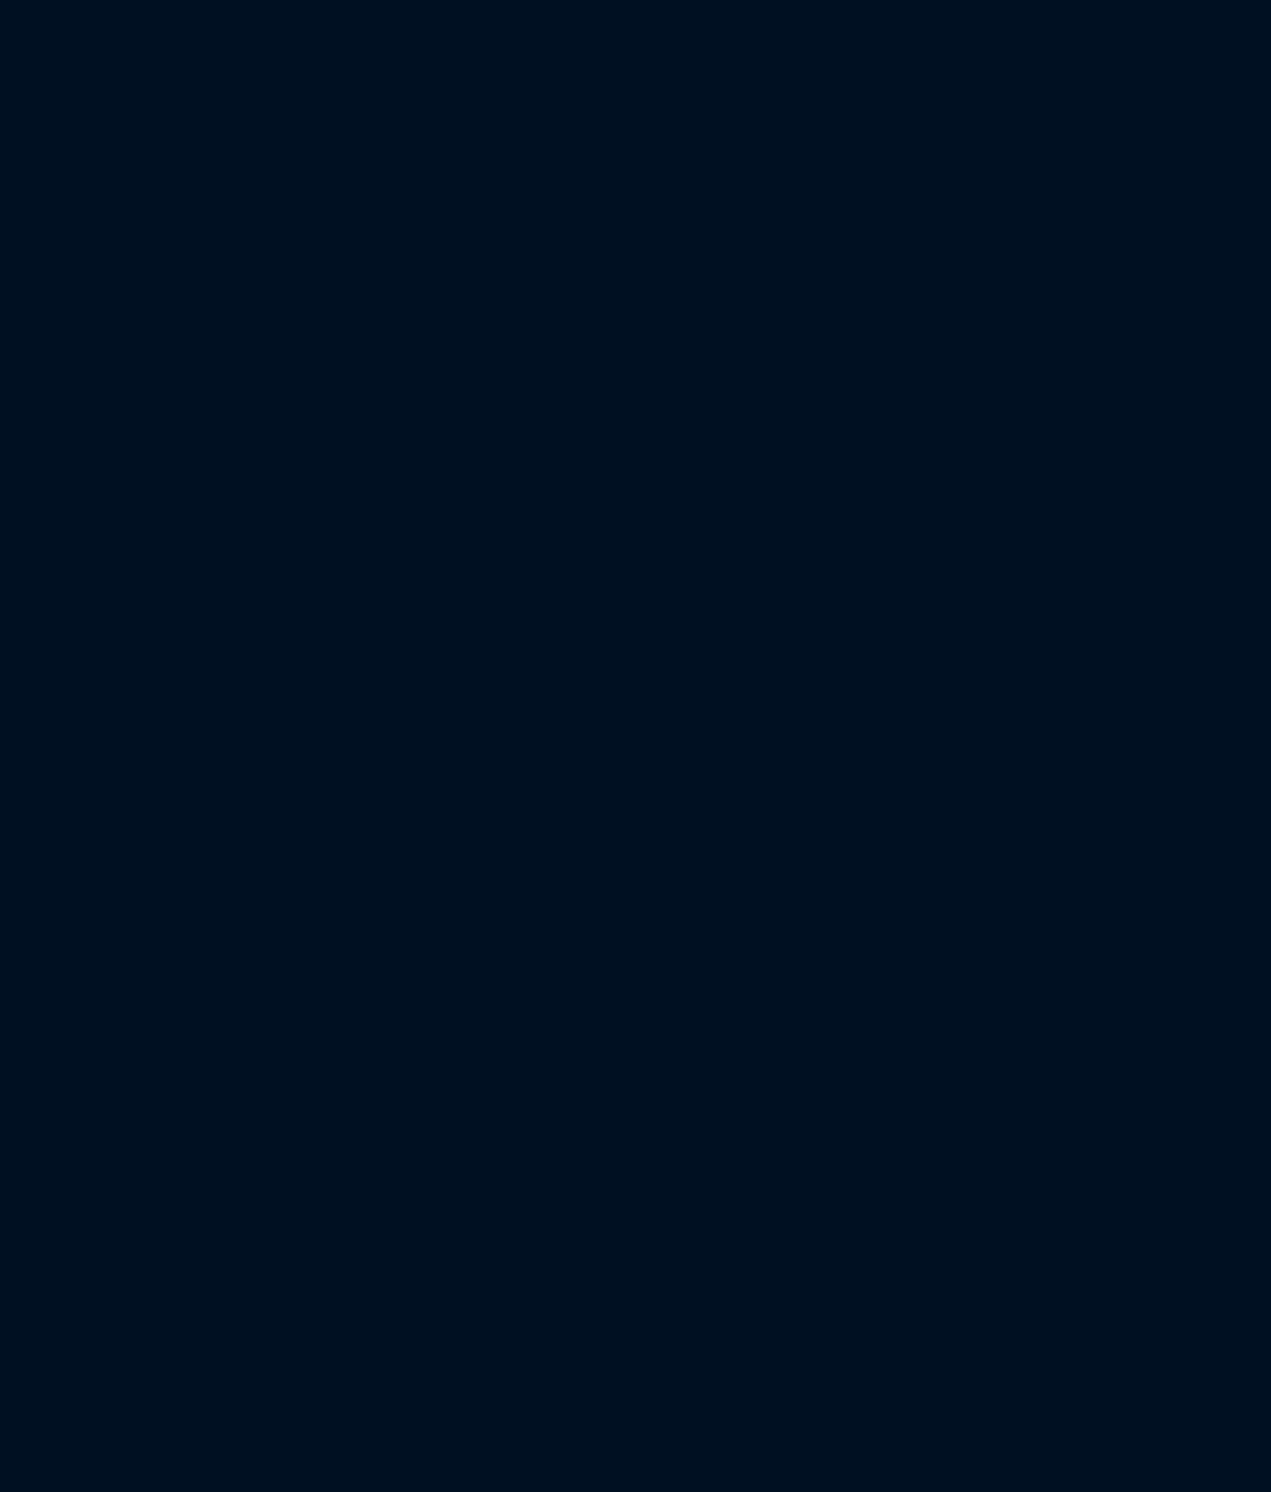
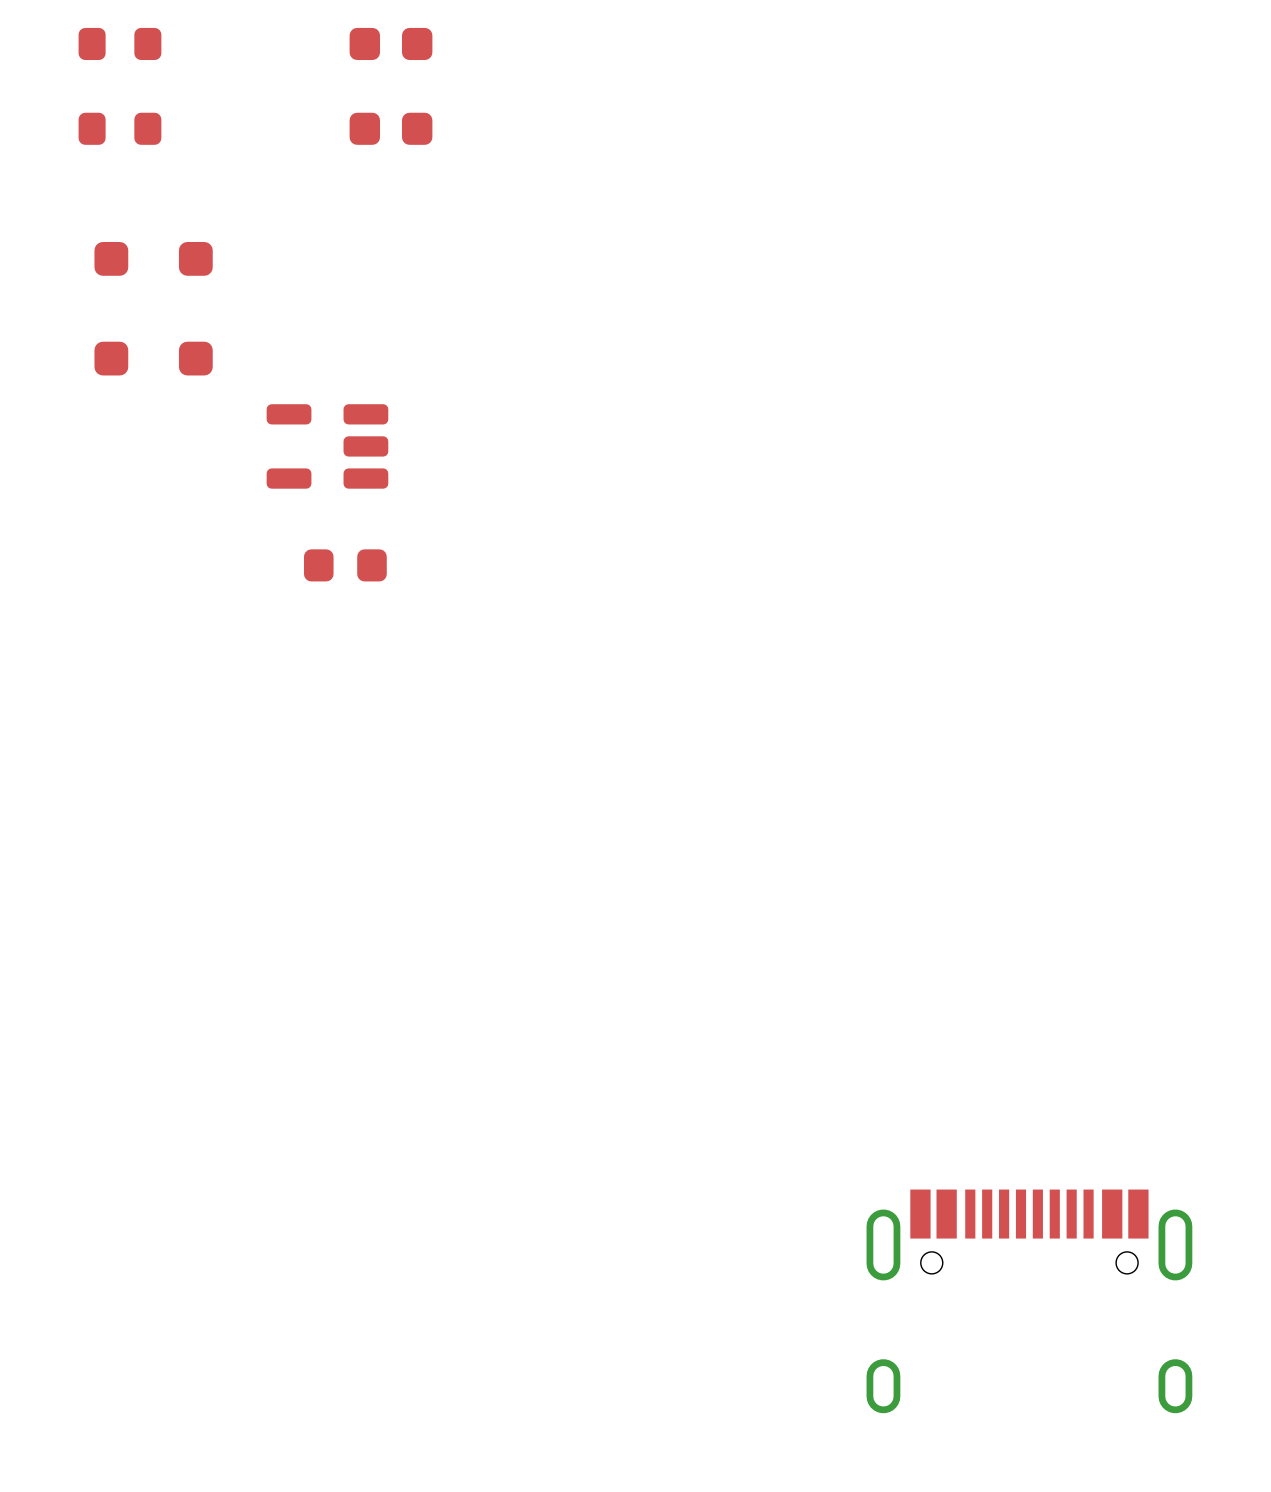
part: none -> (119, 43)
part: none -> (391, 43)
part: none -> (119, 128)
part: none -> (391, 128)
part: none -> (153, 258)
part: none -> (153, 358)
part: none -> (327, 446)
part: none -> (345, 565)
part: none -> (1029, 1301)

